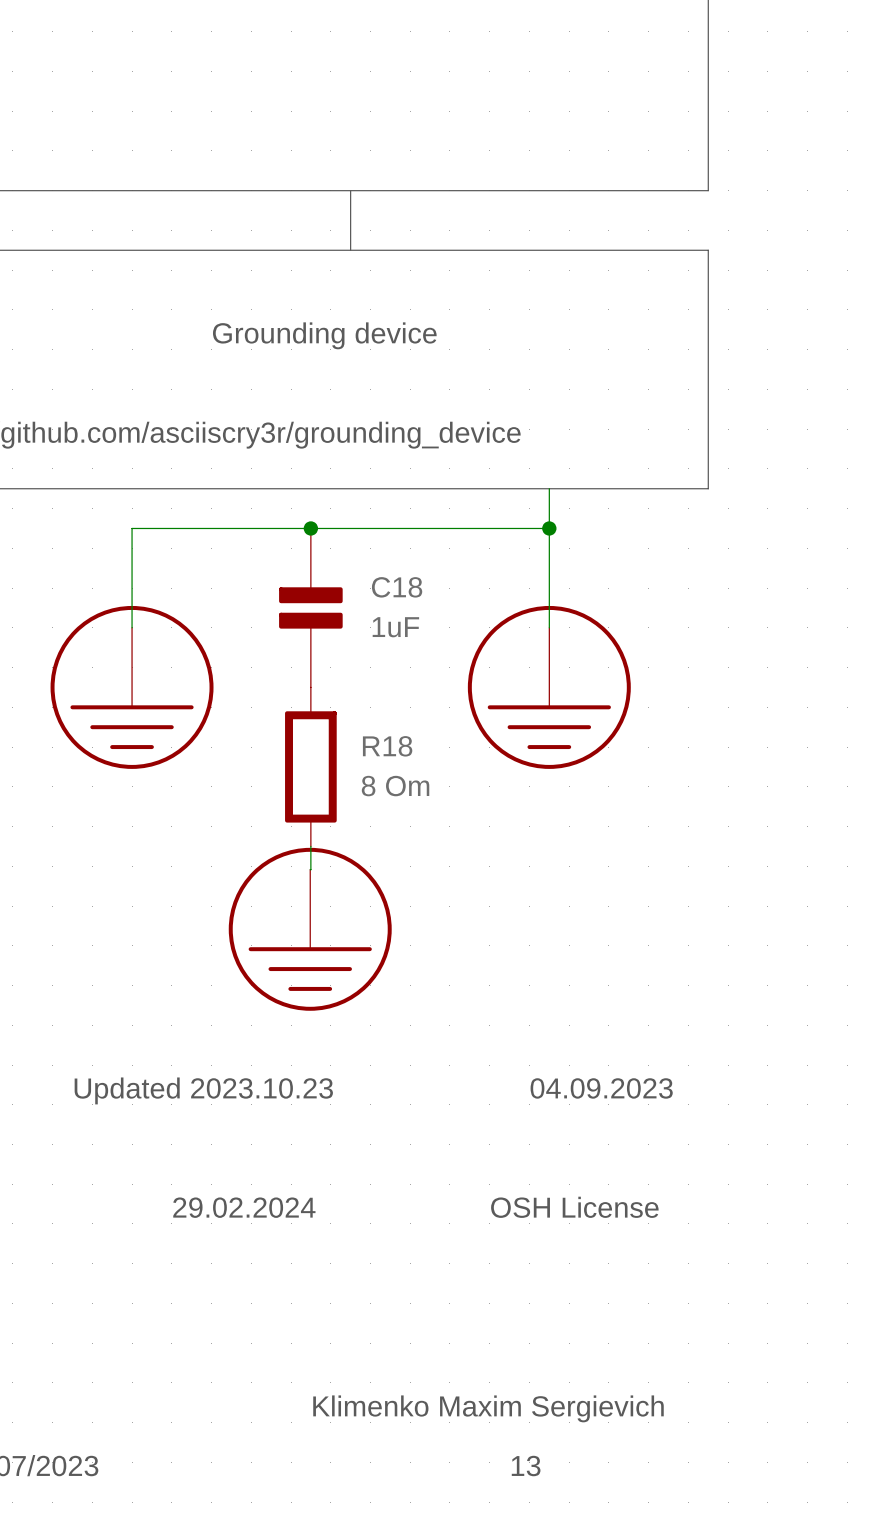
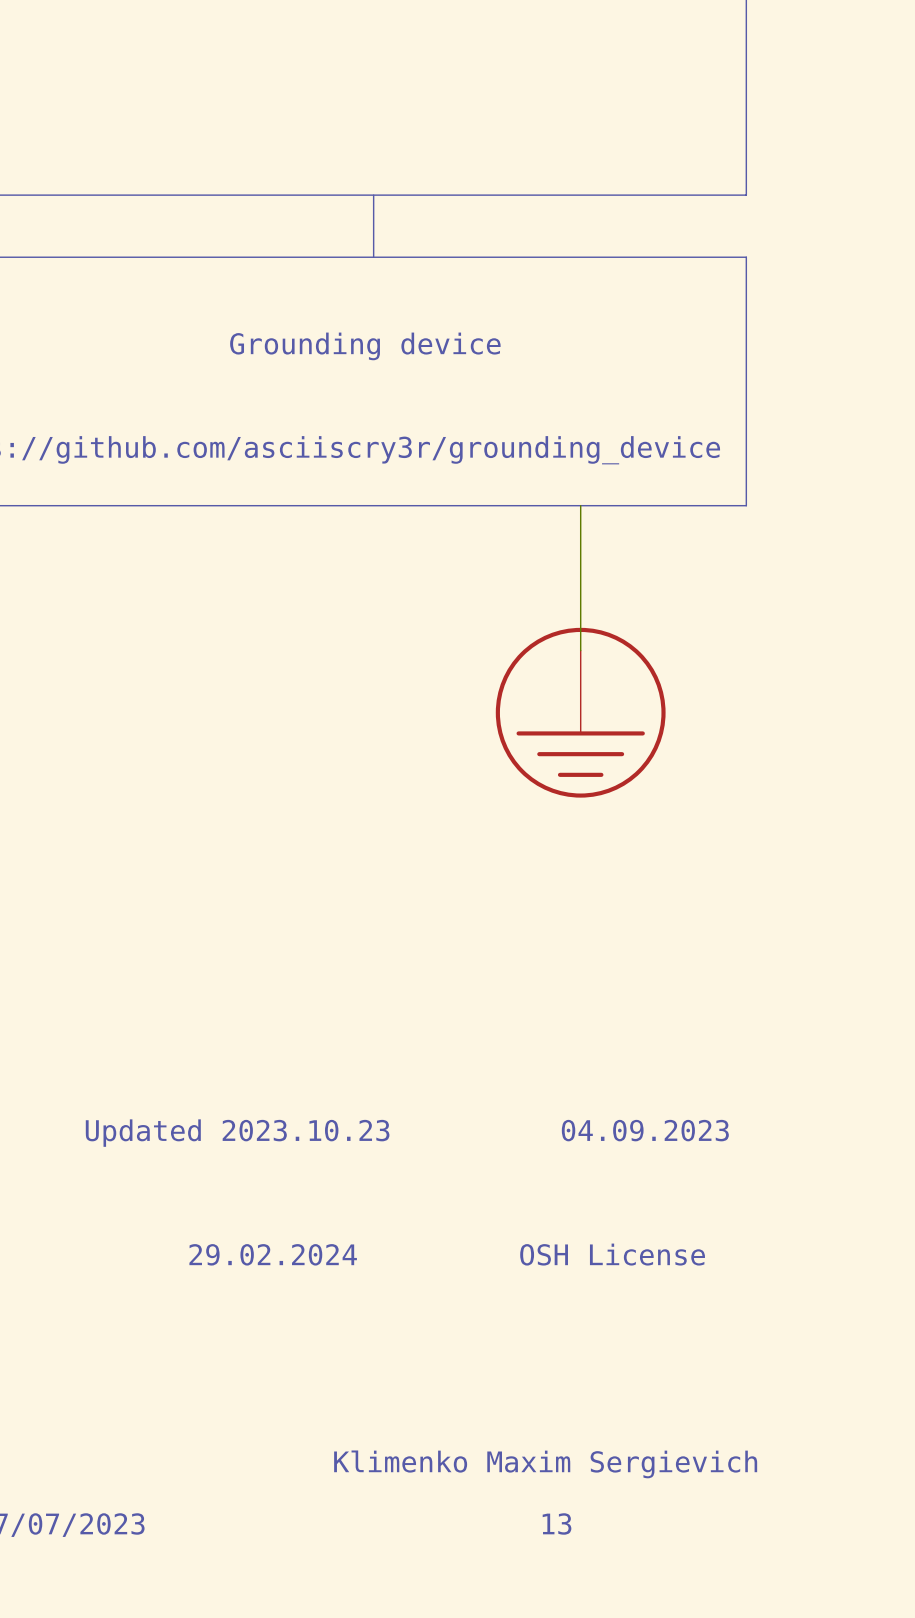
junction: (310, 528) -> none
wire: (549, 528) (132, 528) (132, 627) -> none
junction: (549, 528) -> none
C18: 1uF (310, 607) -> none
power symbol: (132, 687) -> none
R18: 8 Om (310, 766) -> none
wire: (310, 846) (310, 869) -> none
power symbol: (310, 929) -> none

